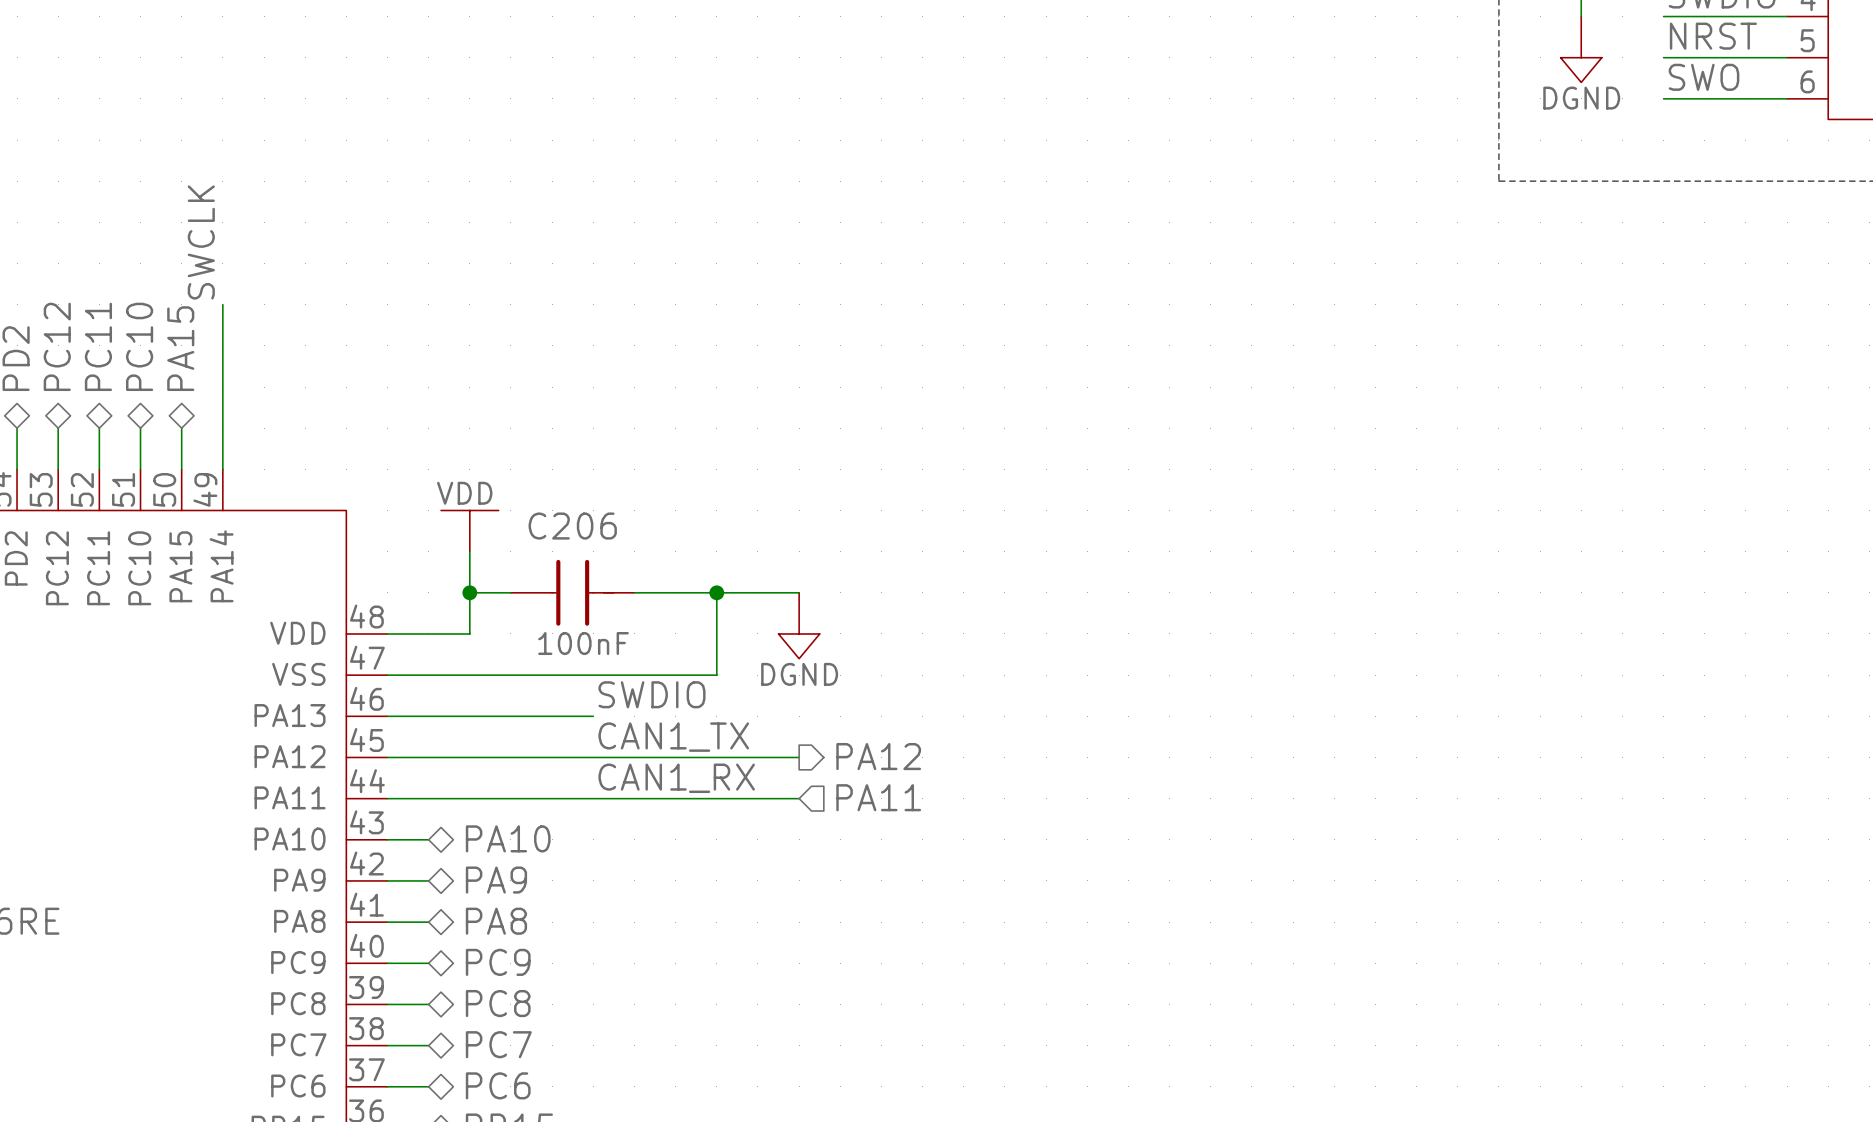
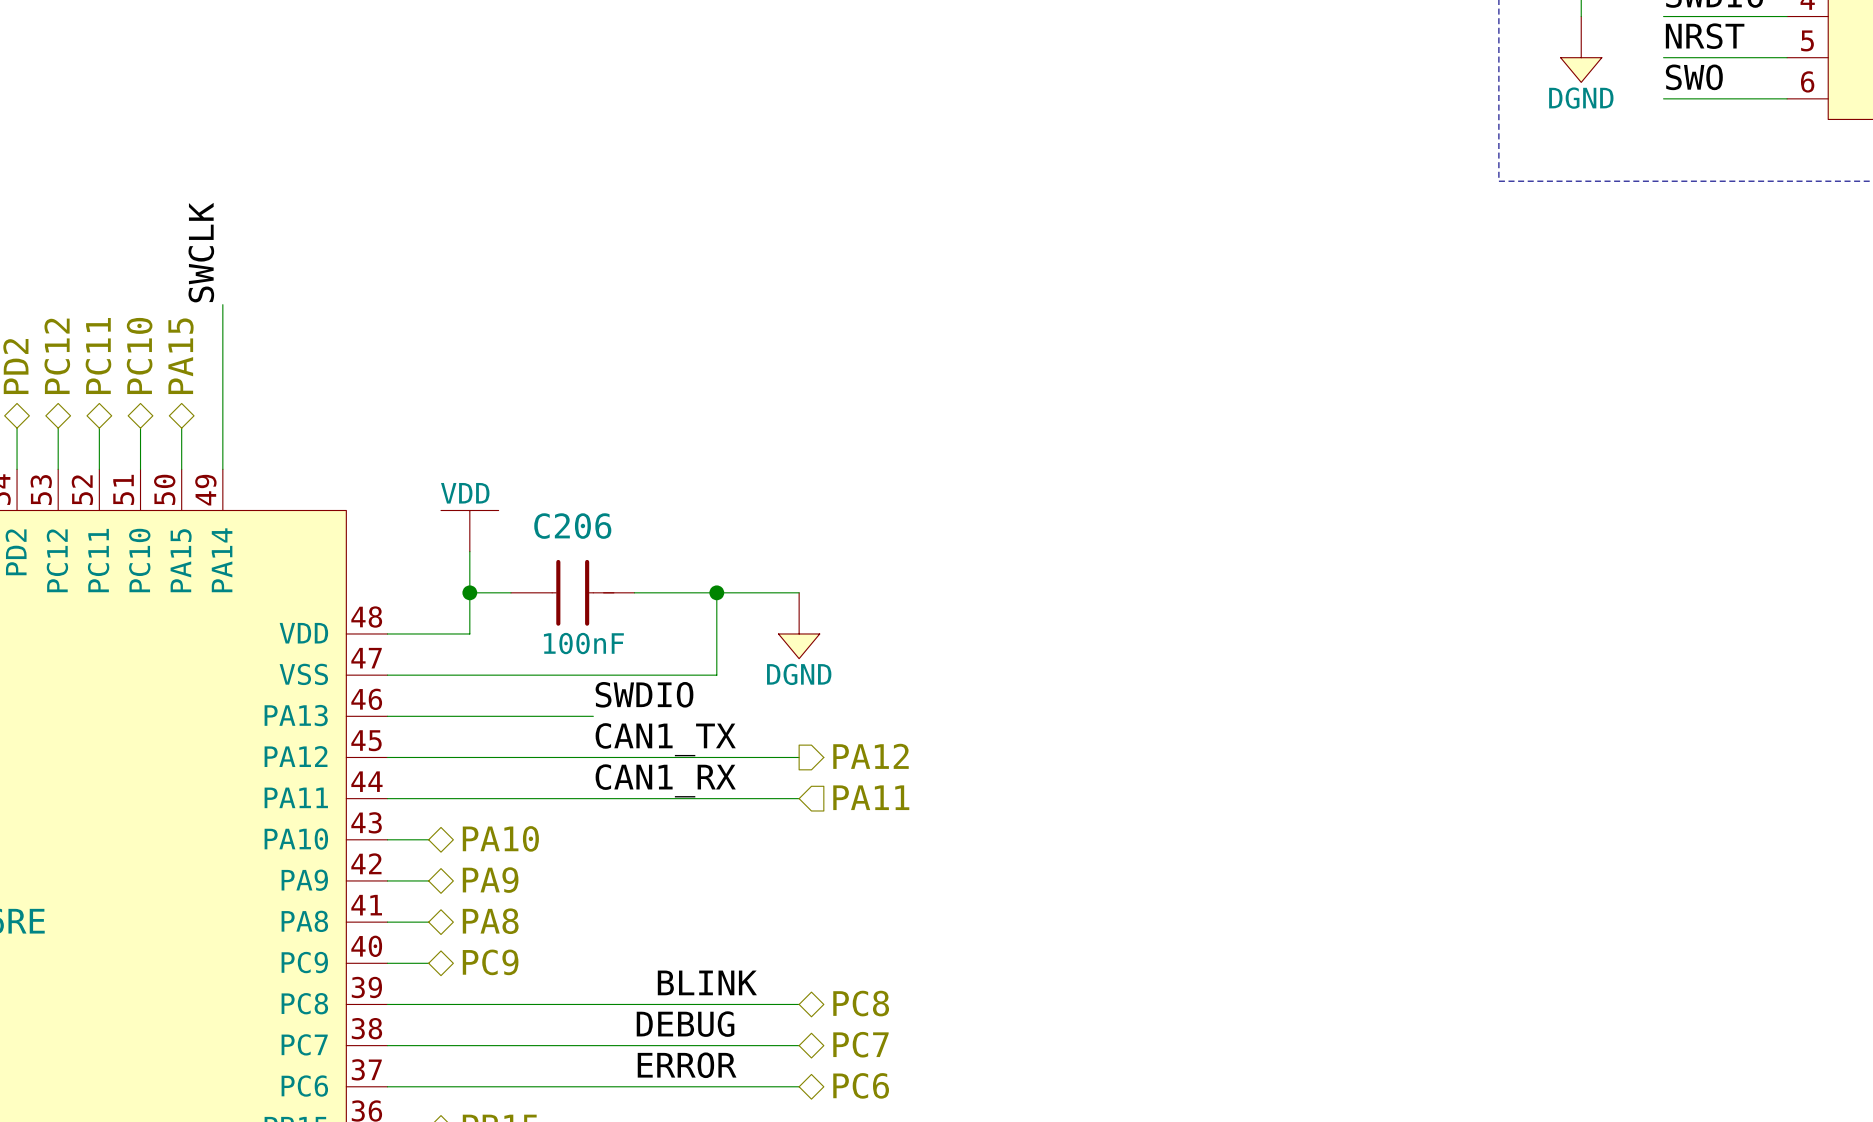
label: none -> BLINK (707, 982)
hierarchical label position: PC8 (498, 1003) -> PC8 (861, 1003)
wire: none -> (428, 1004) (799, 1004)
label: none -> DEBUG (685, 1024)
hierarchical label position: PC7 (498, 1044) -> PC7 (860, 1044)
wire: none -> (428, 1045) (799, 1045)
label: none -> ERROR (687, 1065)
hierarchical label position: PC6 (498, 1085) -> PC6 (861, 1085)
wire: none -> (428, 1086) (799, 1086)

